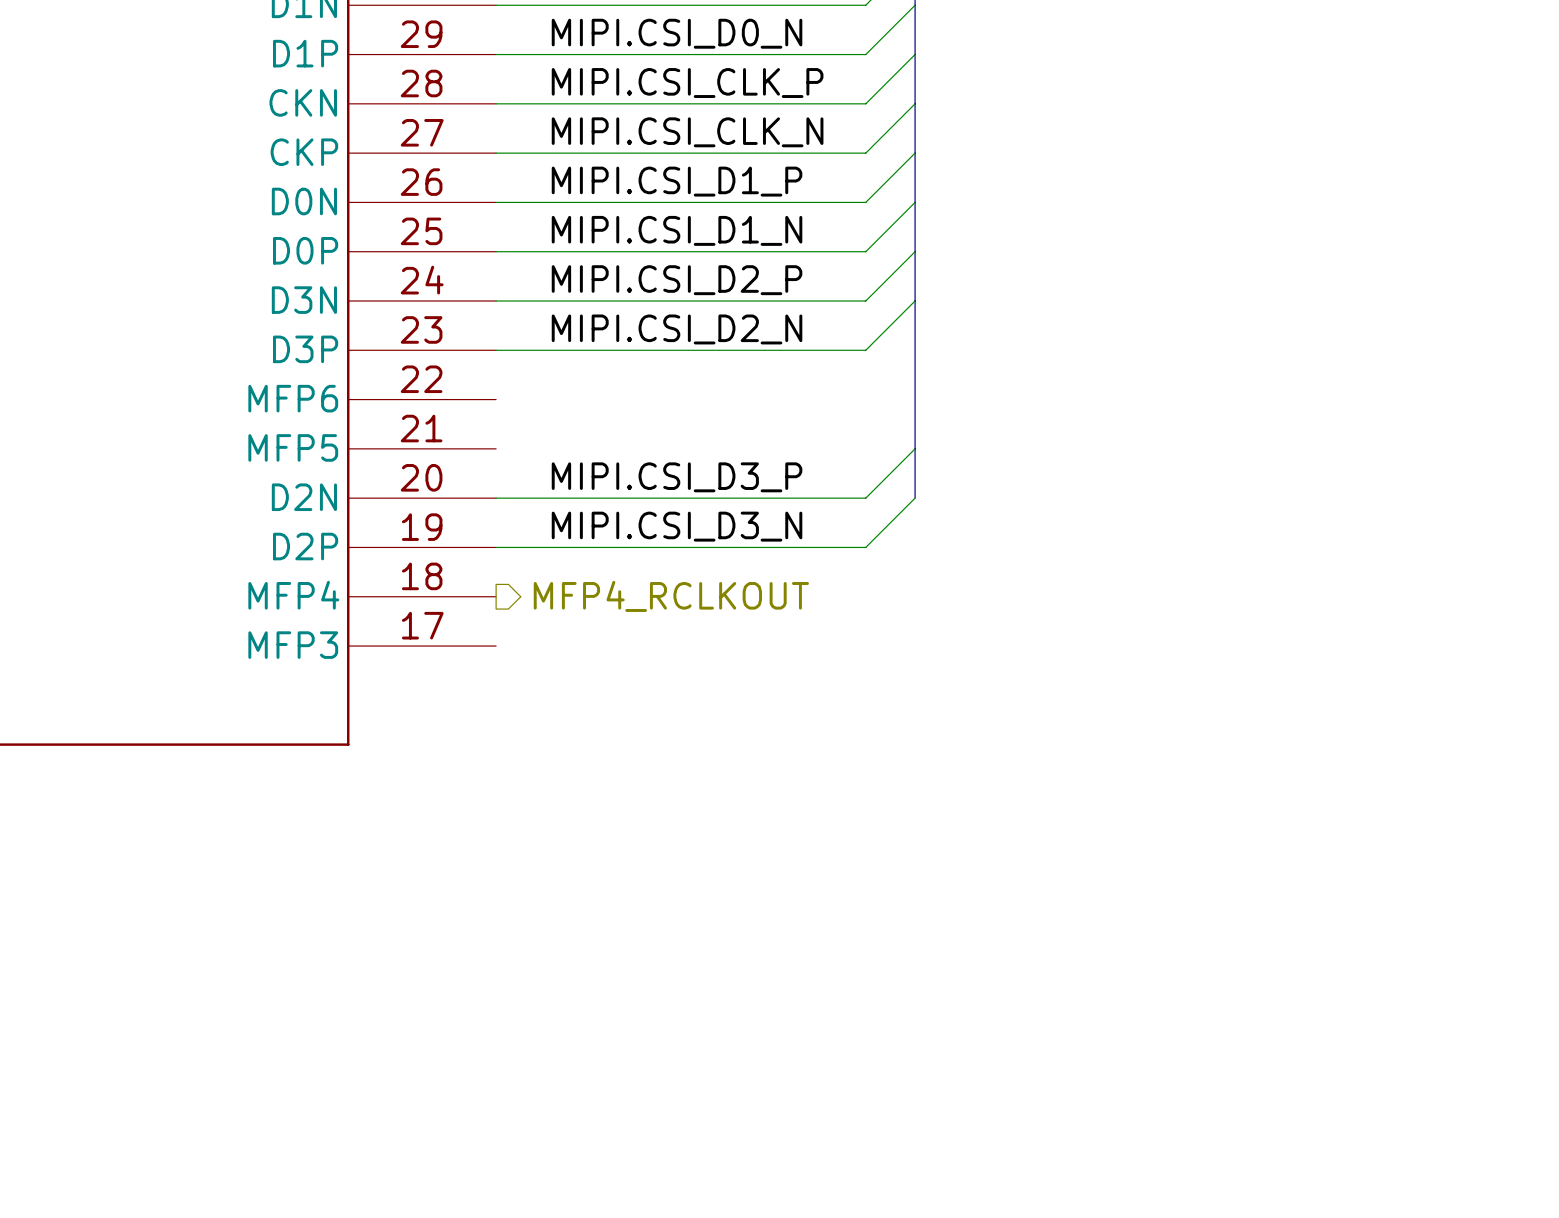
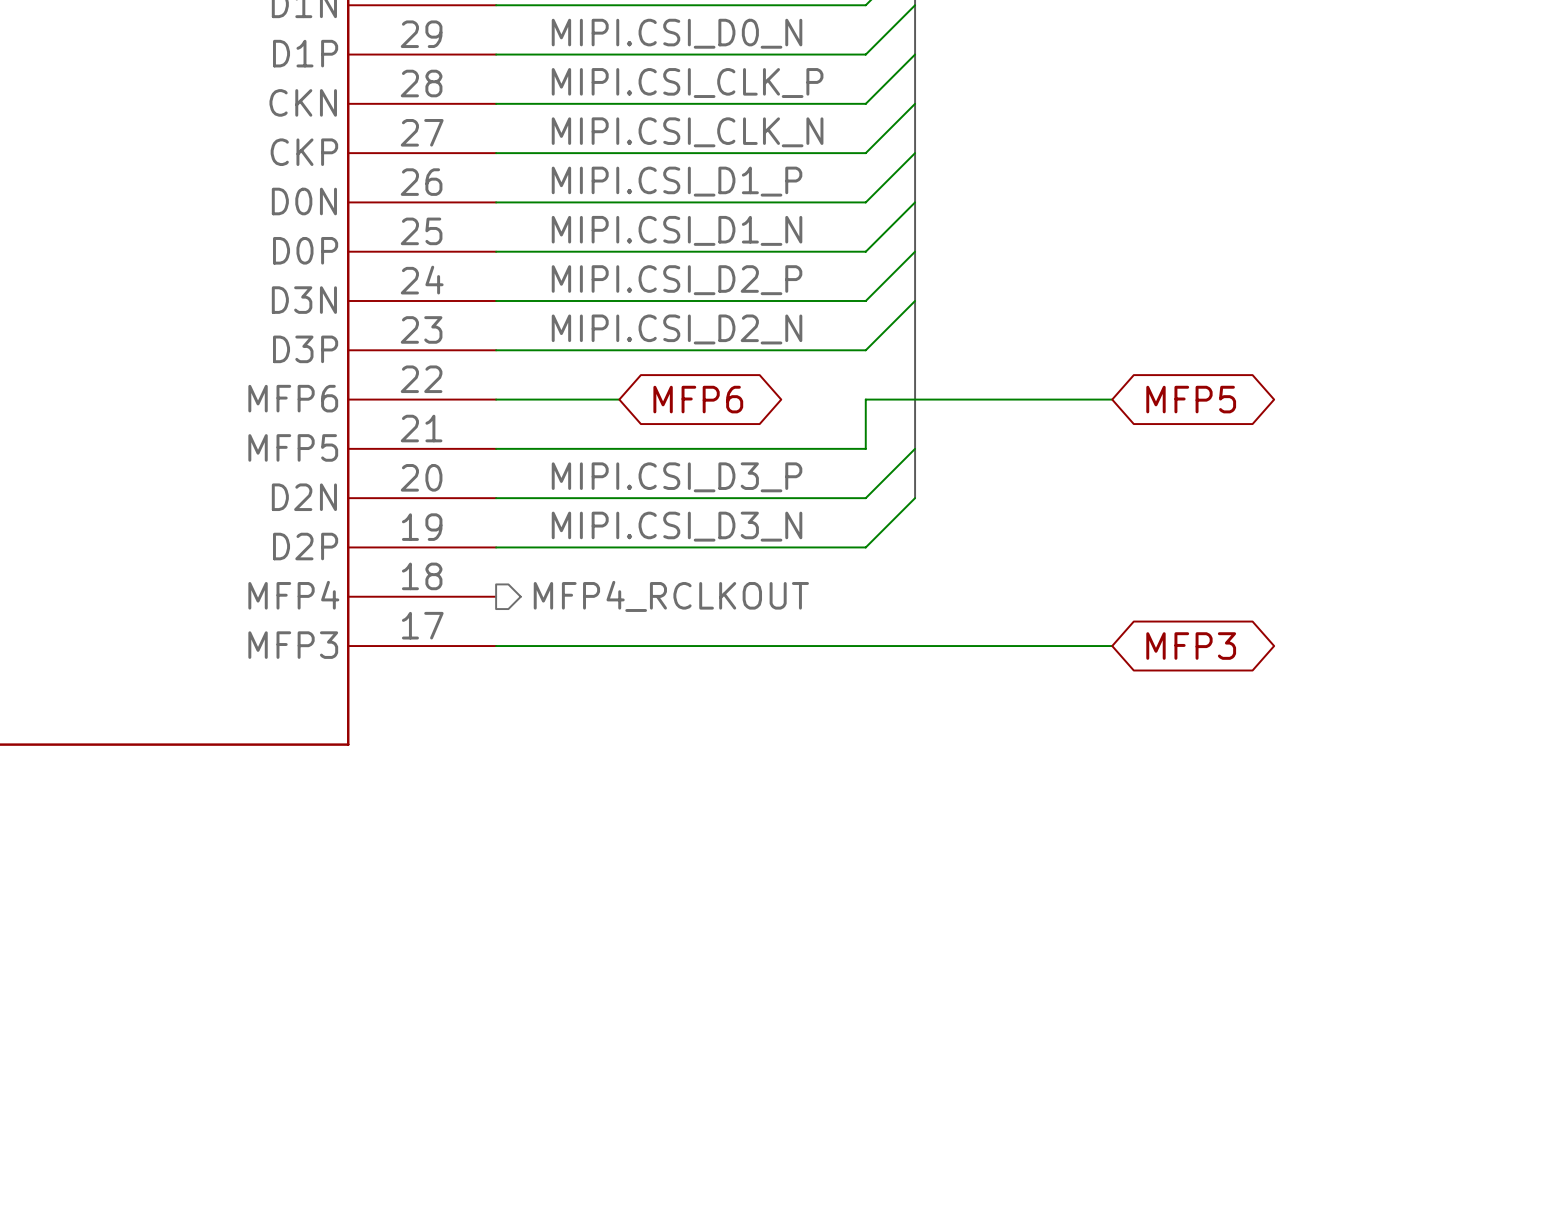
wire: none -> (496, 399) (619, 399)
global label: none -> MFP6 (698, 399)
wire: none -> (1112, 399) (865, 399) (865, 448) (496, 448)
global label: none -> MFP5 (1191, 399)
wire: none -> (496, 646) (1112, 646)
global label: none -> MFP3 (1191, 646)

